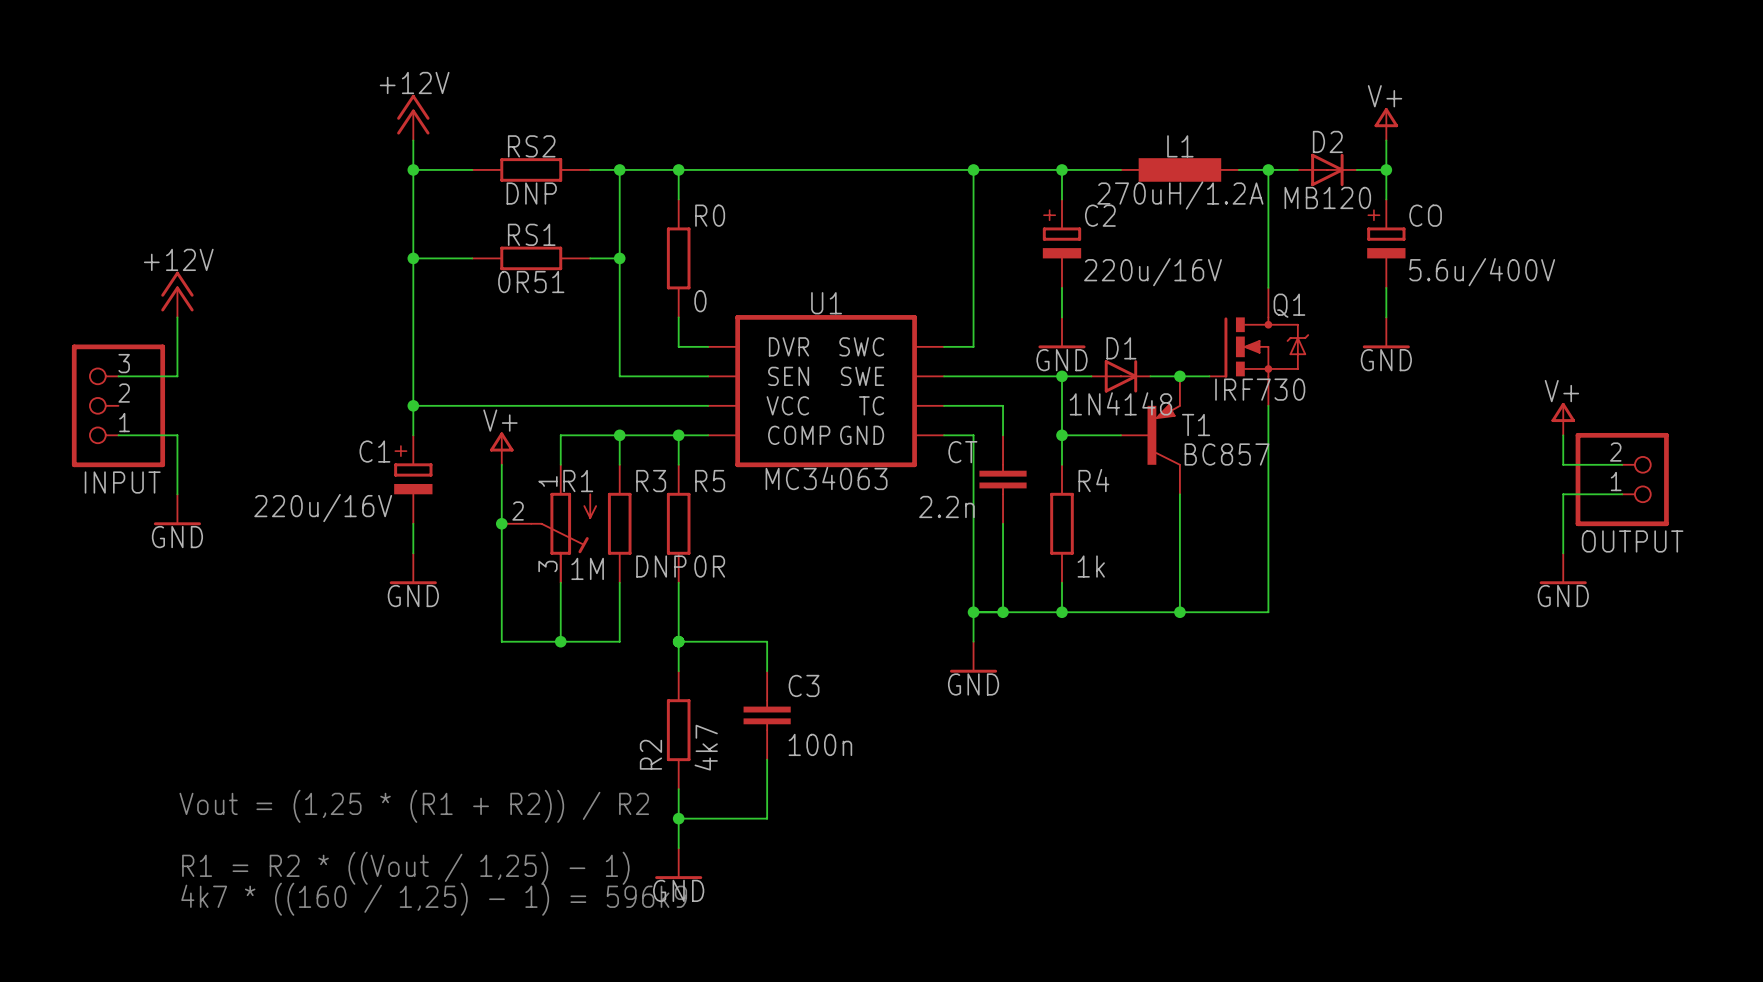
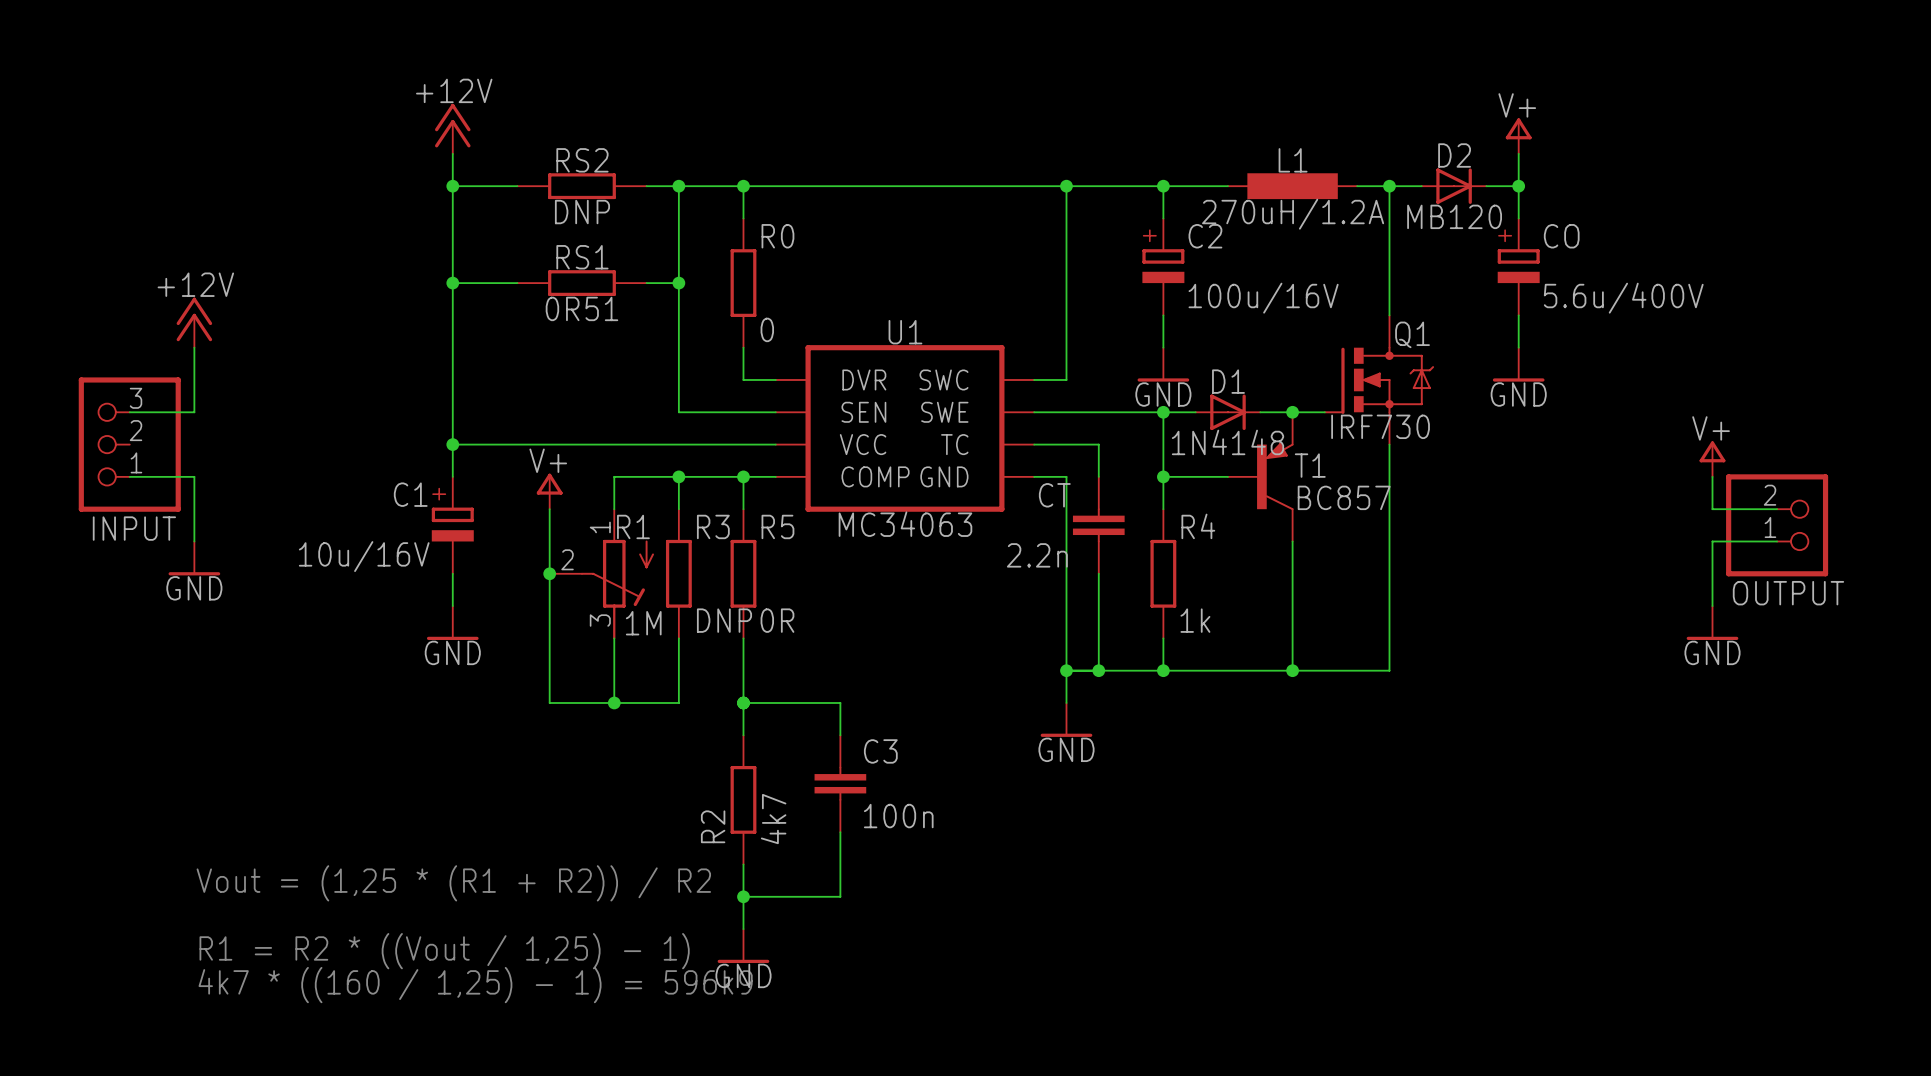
C2 value: 220u/16V (1153, 272) -> 100u/16V (1263, 298)
C1 value: 220u/16V (323, 508) -> 10u/16V (364, 556)

